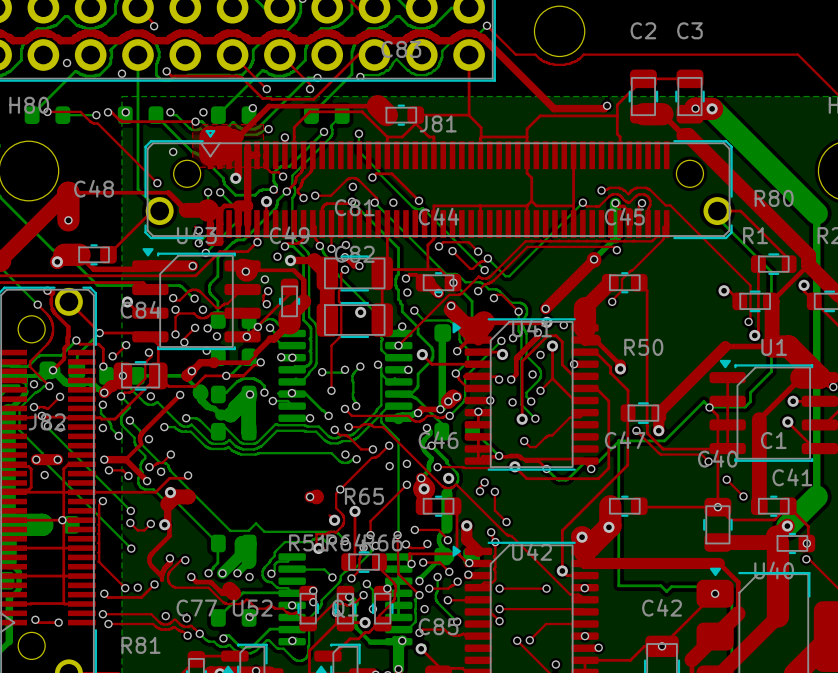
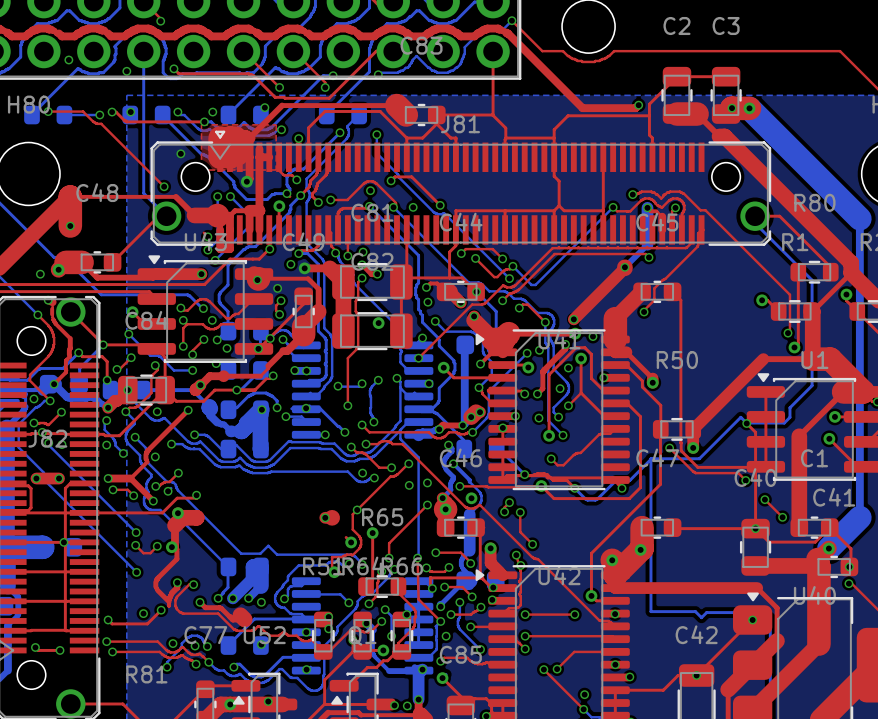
via: none -> (40, 274)
bottom track: none -> (128, 334) (150, 355) (160, 356) (173, 370) (192, 370)
via: none -> (128, 334)
via: none -> (192, 370)
via: (44, 475) -> none
top track: (102, 501) (99, 504) (98, 561) (125, 588) -> none
via: (102, 501) -> none
via: (125, 588) -> none
bottom track: none -> (207, 646) (202, 638) (197, 635) (187, 637) (181, 643) (180, 648) (167, 662) (167, 667)
via: none -> (207, 646)
via: none -> (167, 667)

